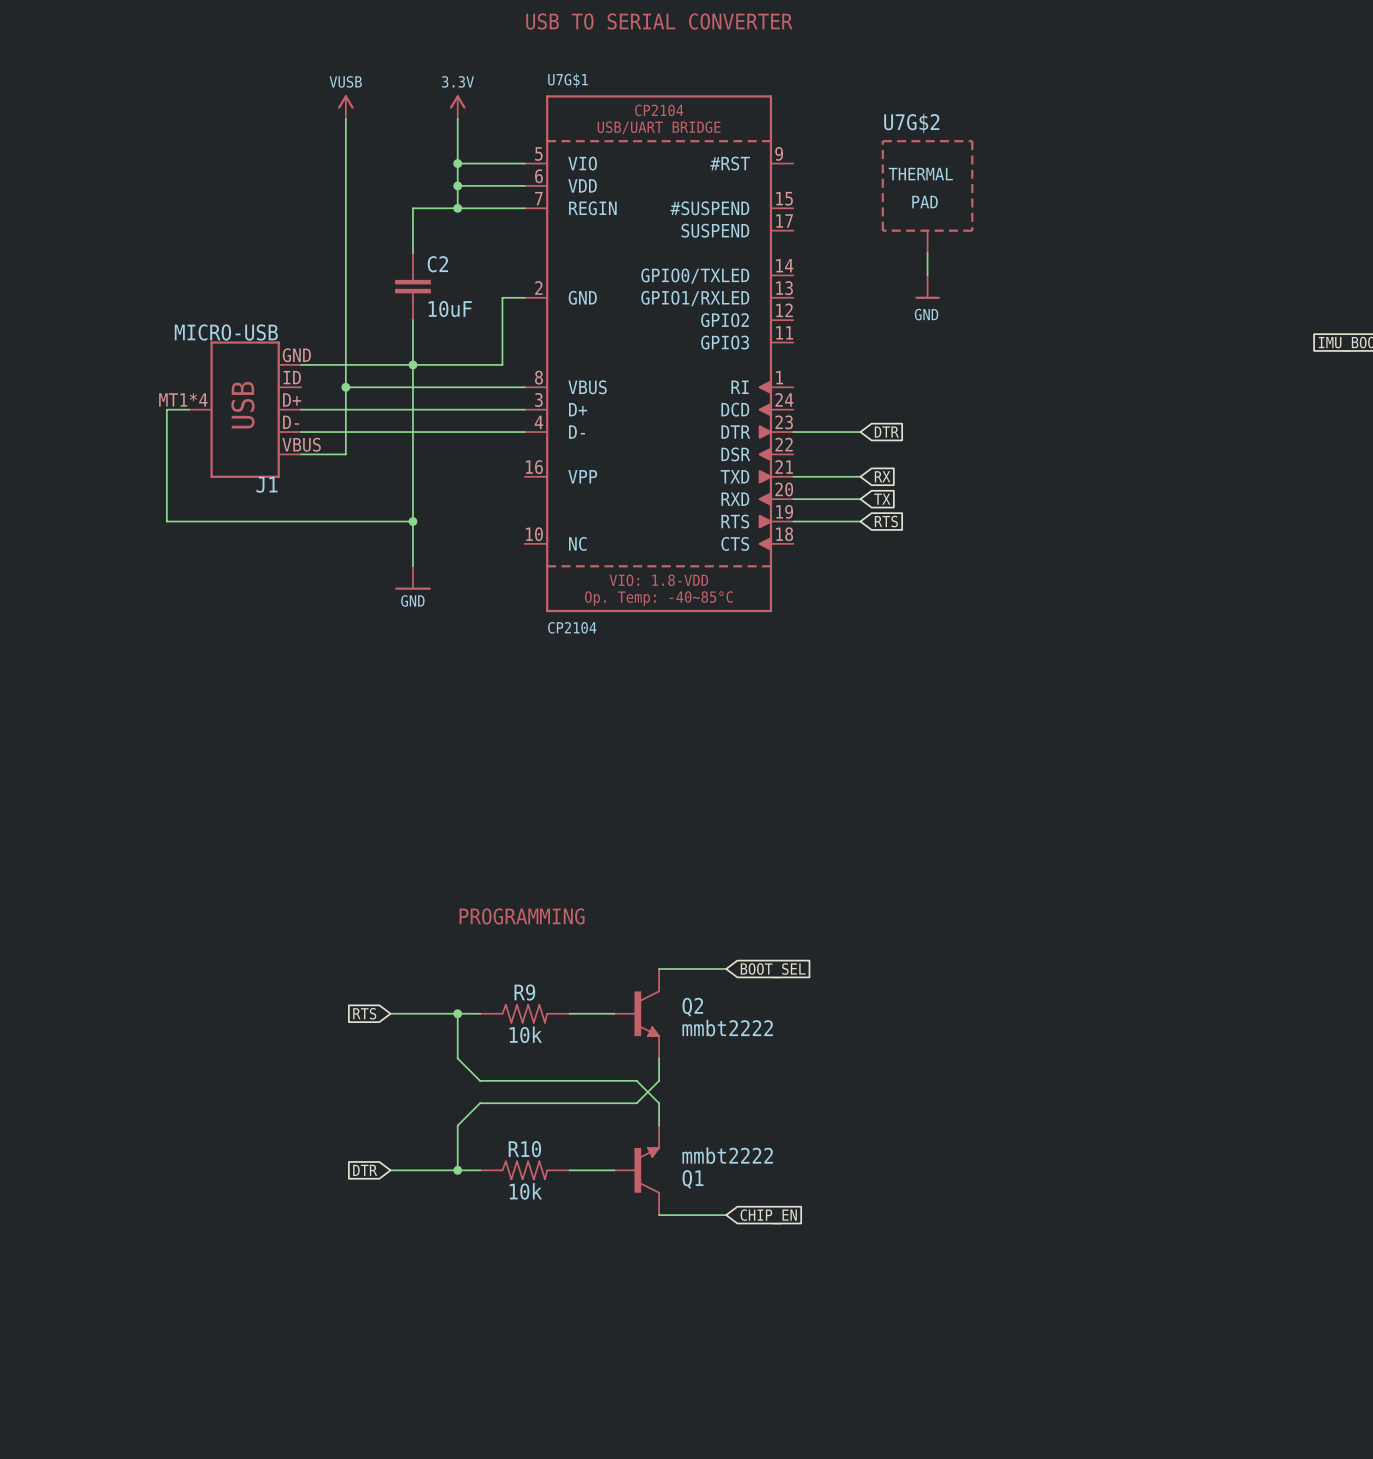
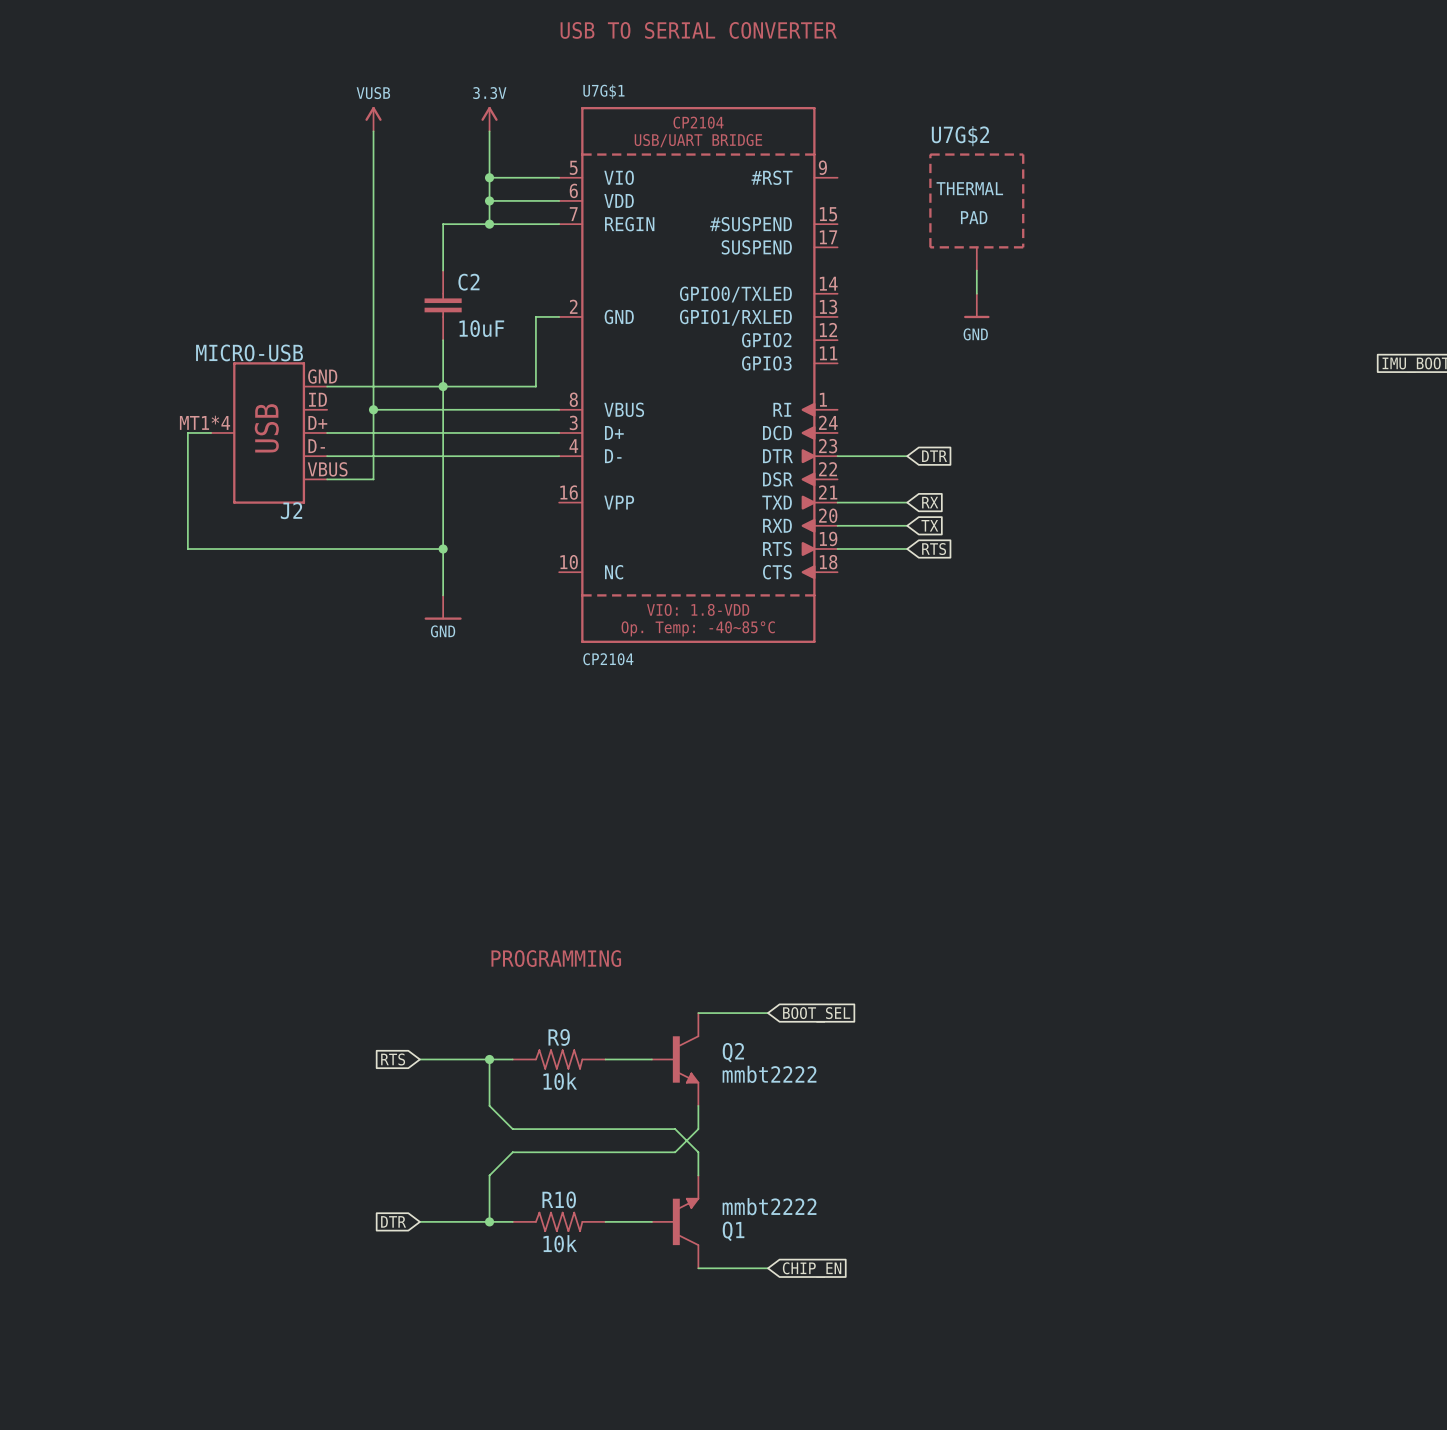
J1 name: J1 (266, 484) -> J2 (291, 510)

